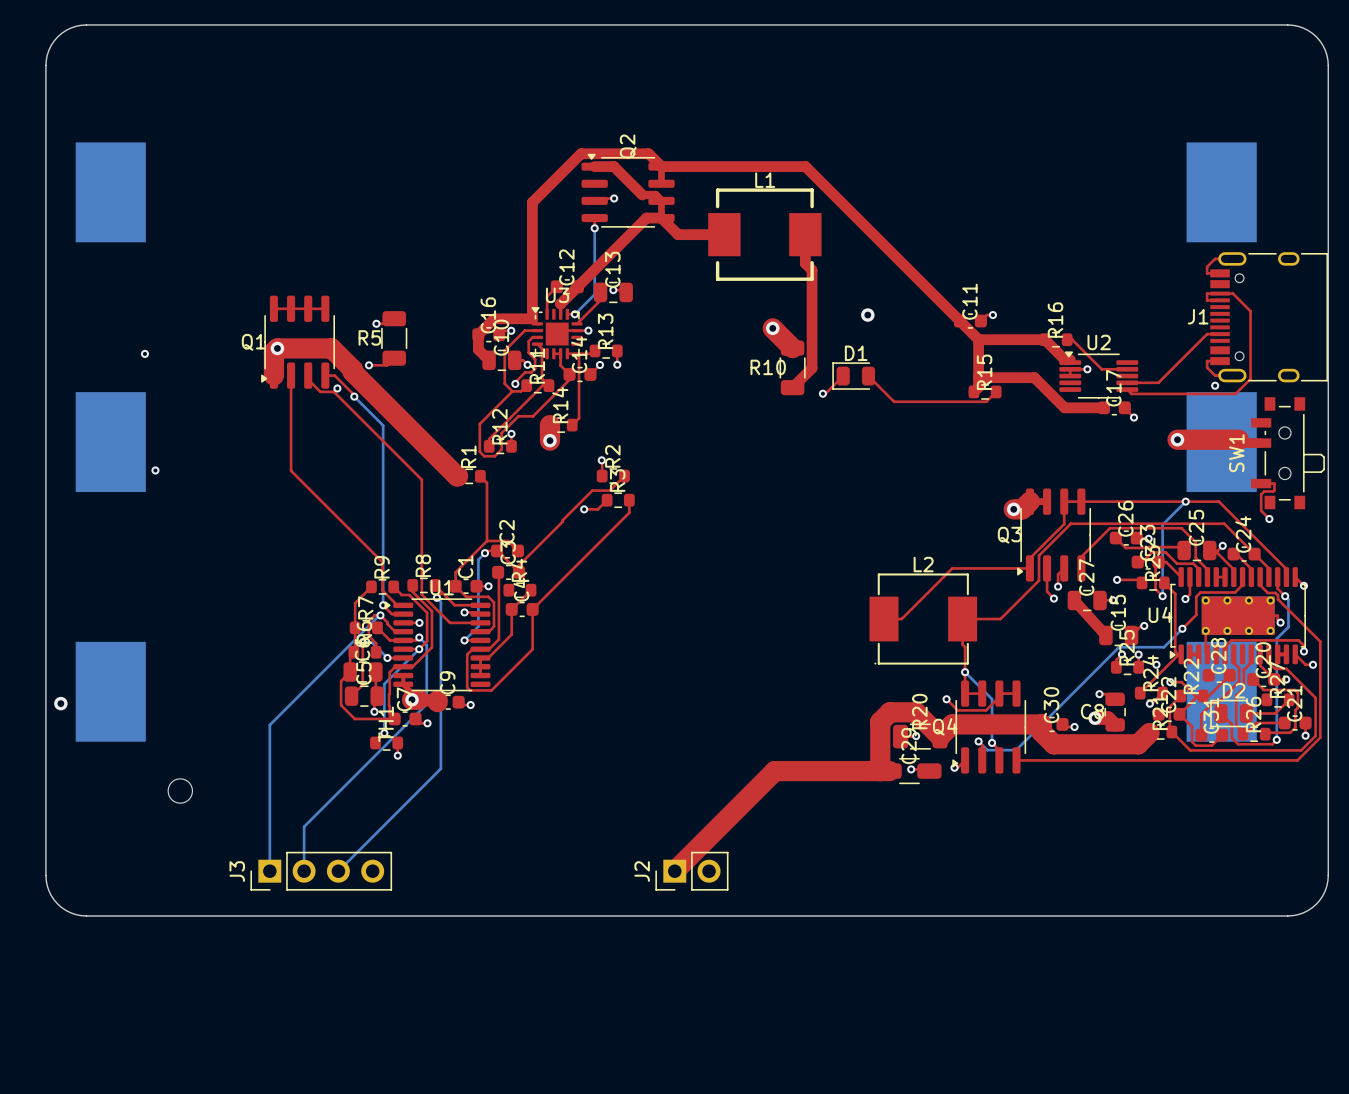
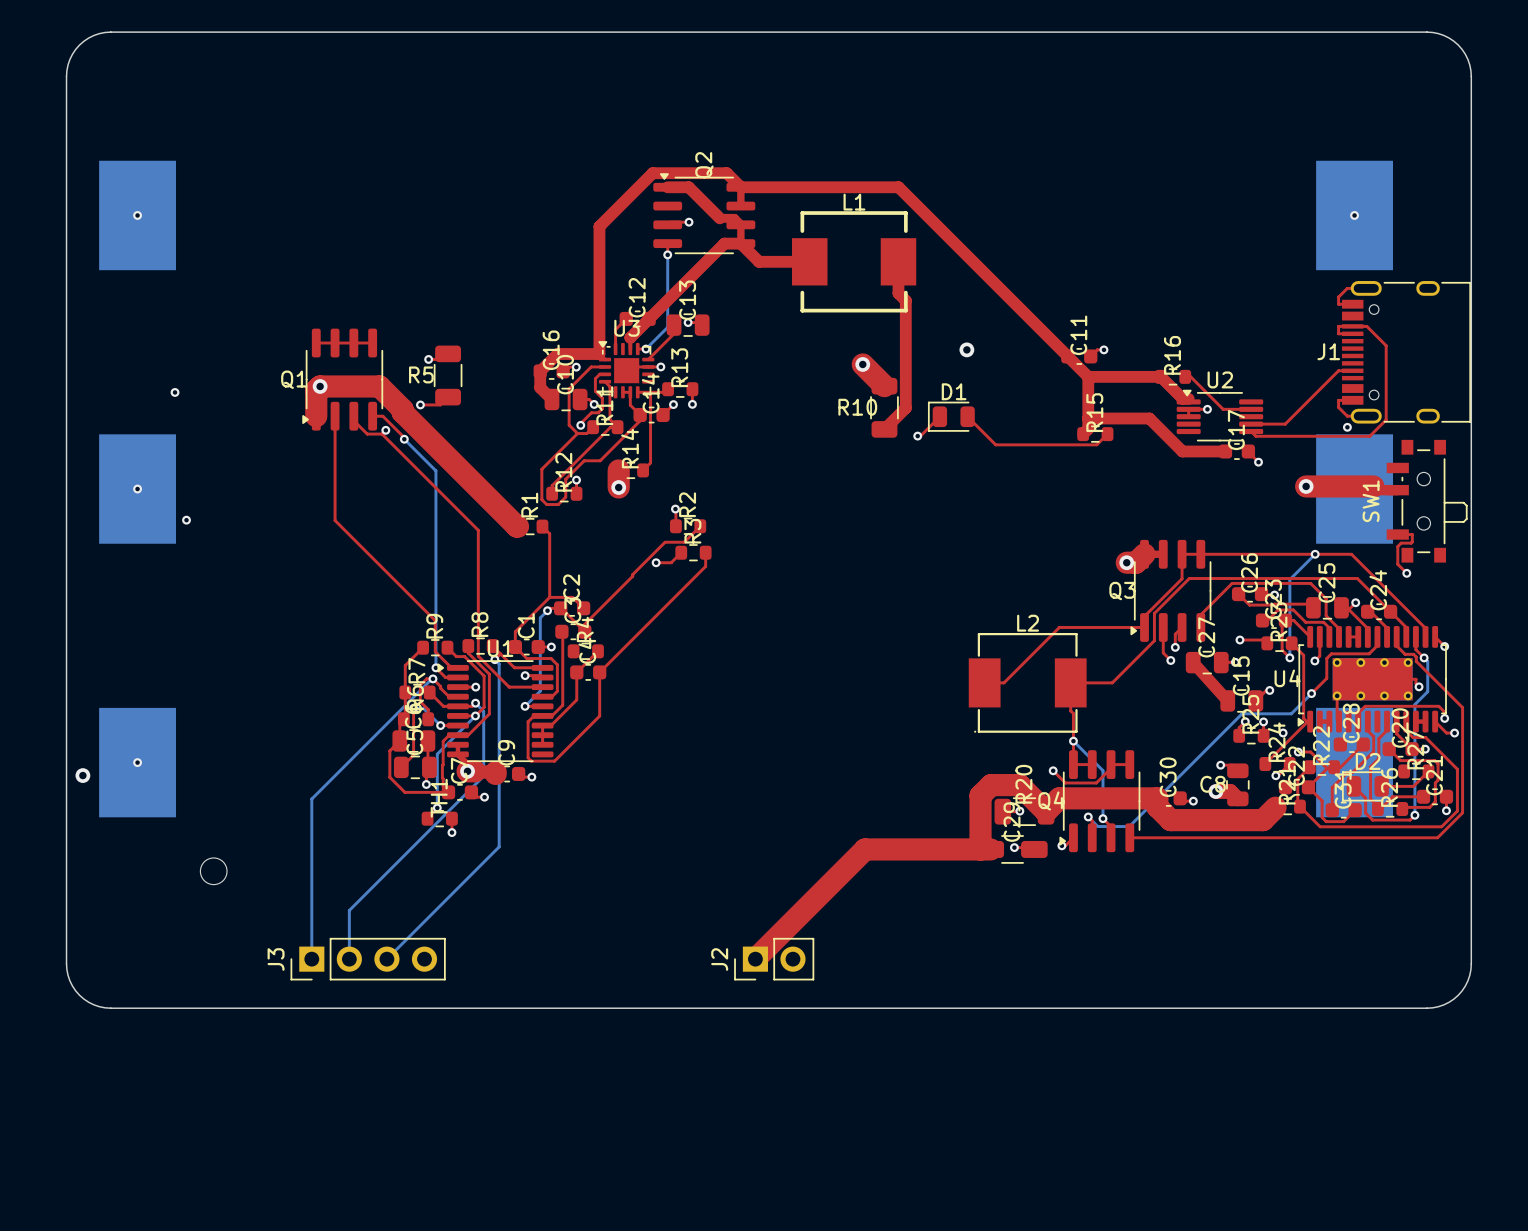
via: none -> (137, 215)
via: none -> (1354, 215)
via: none -> (137, 489)
via: none -> (137, 762)

